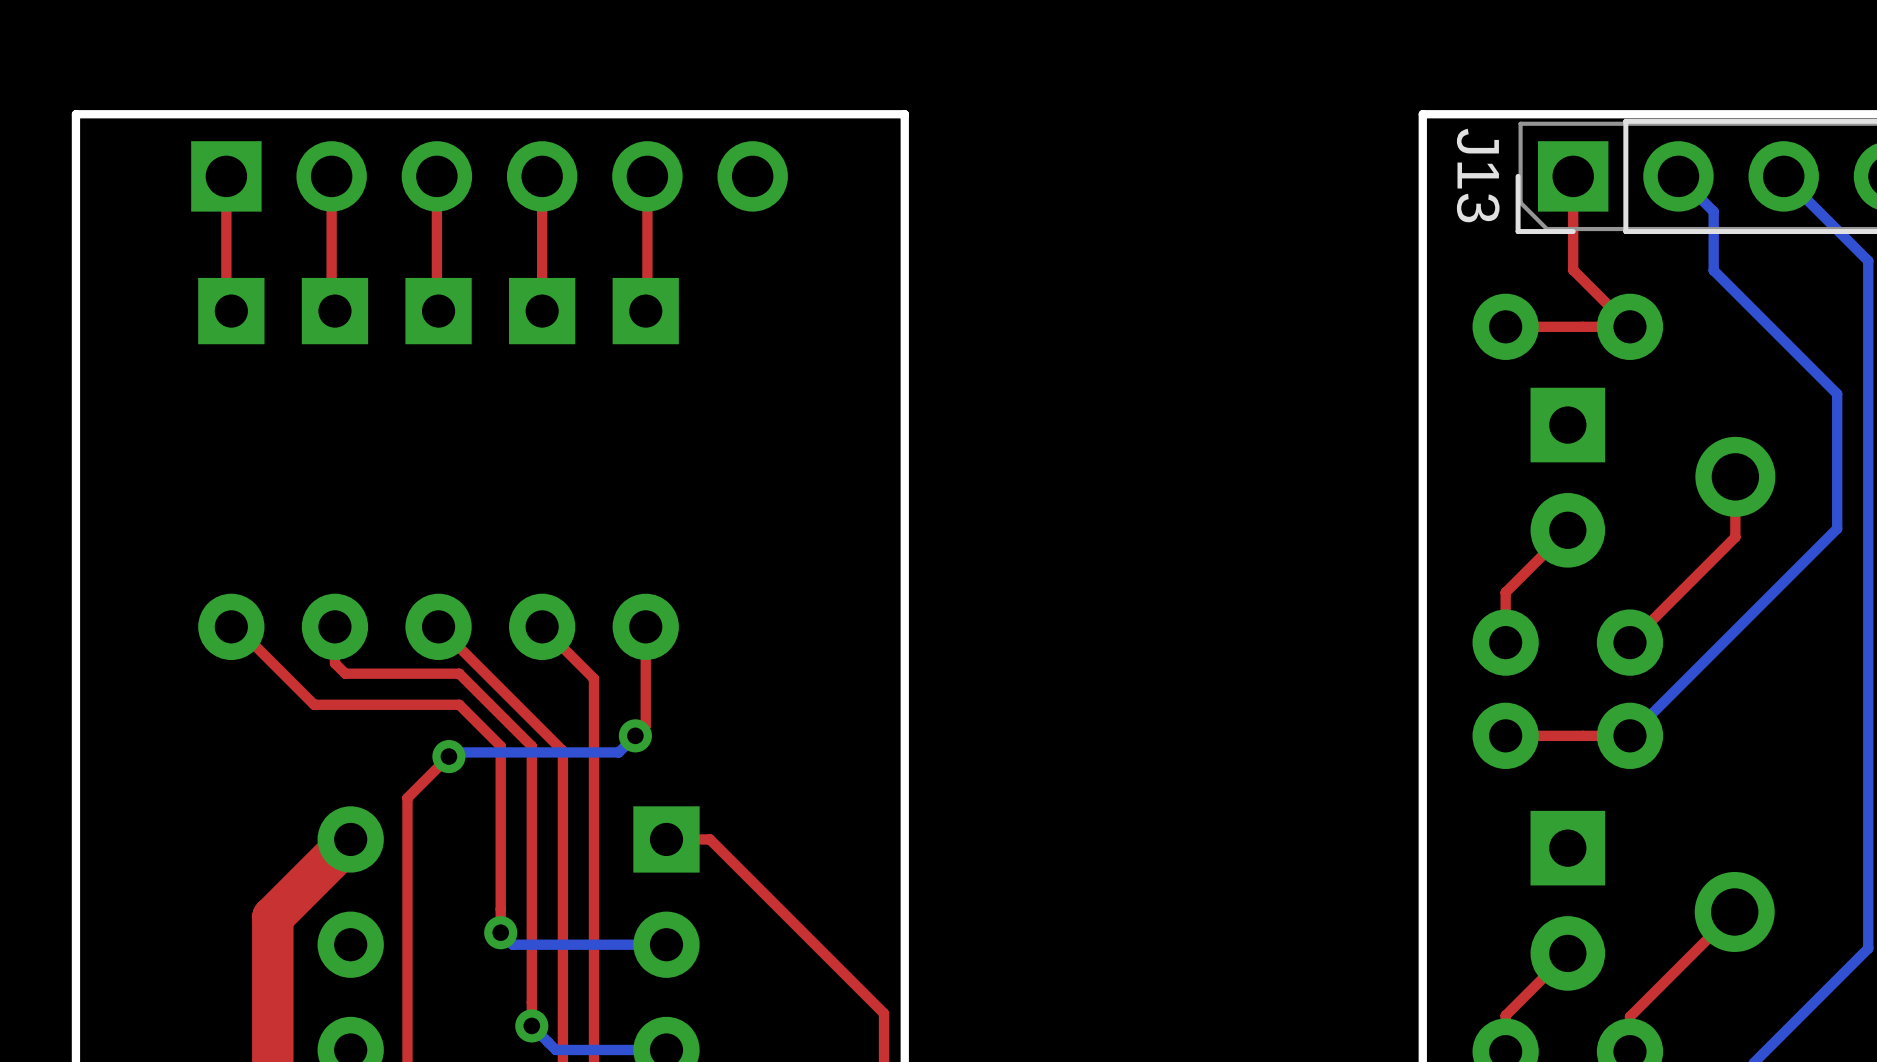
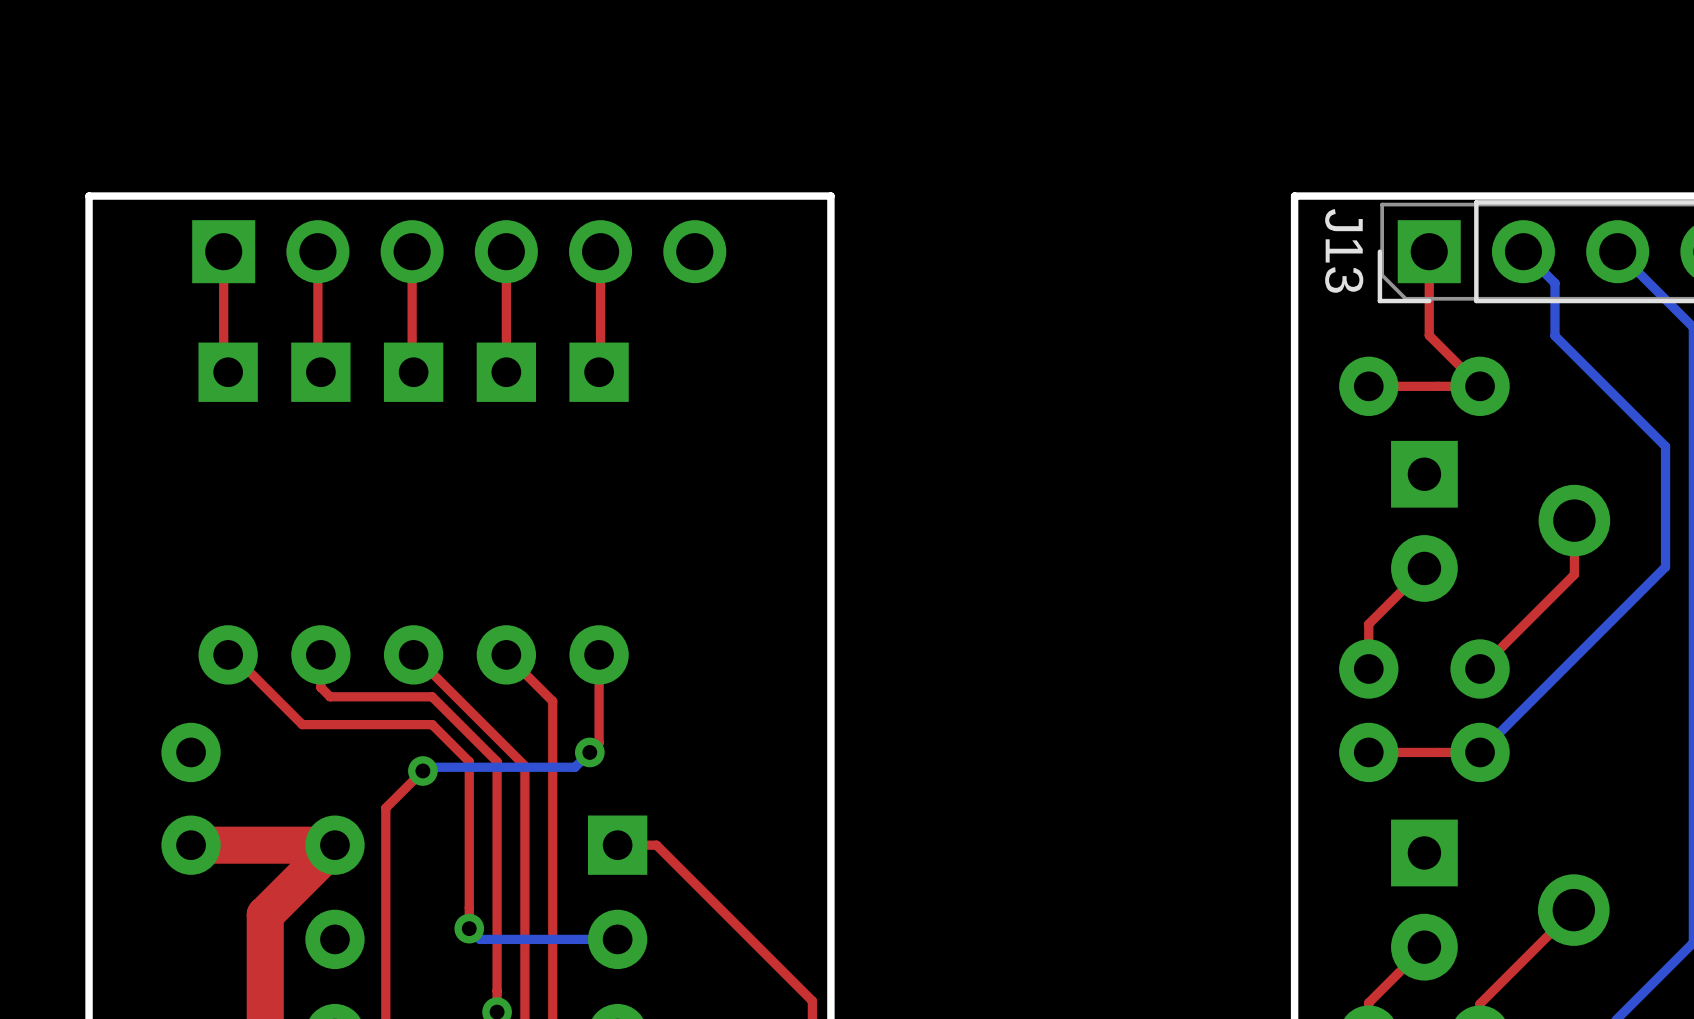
part: none -> (191, 798)
top track: none -> (334, 845) (191, 845)

